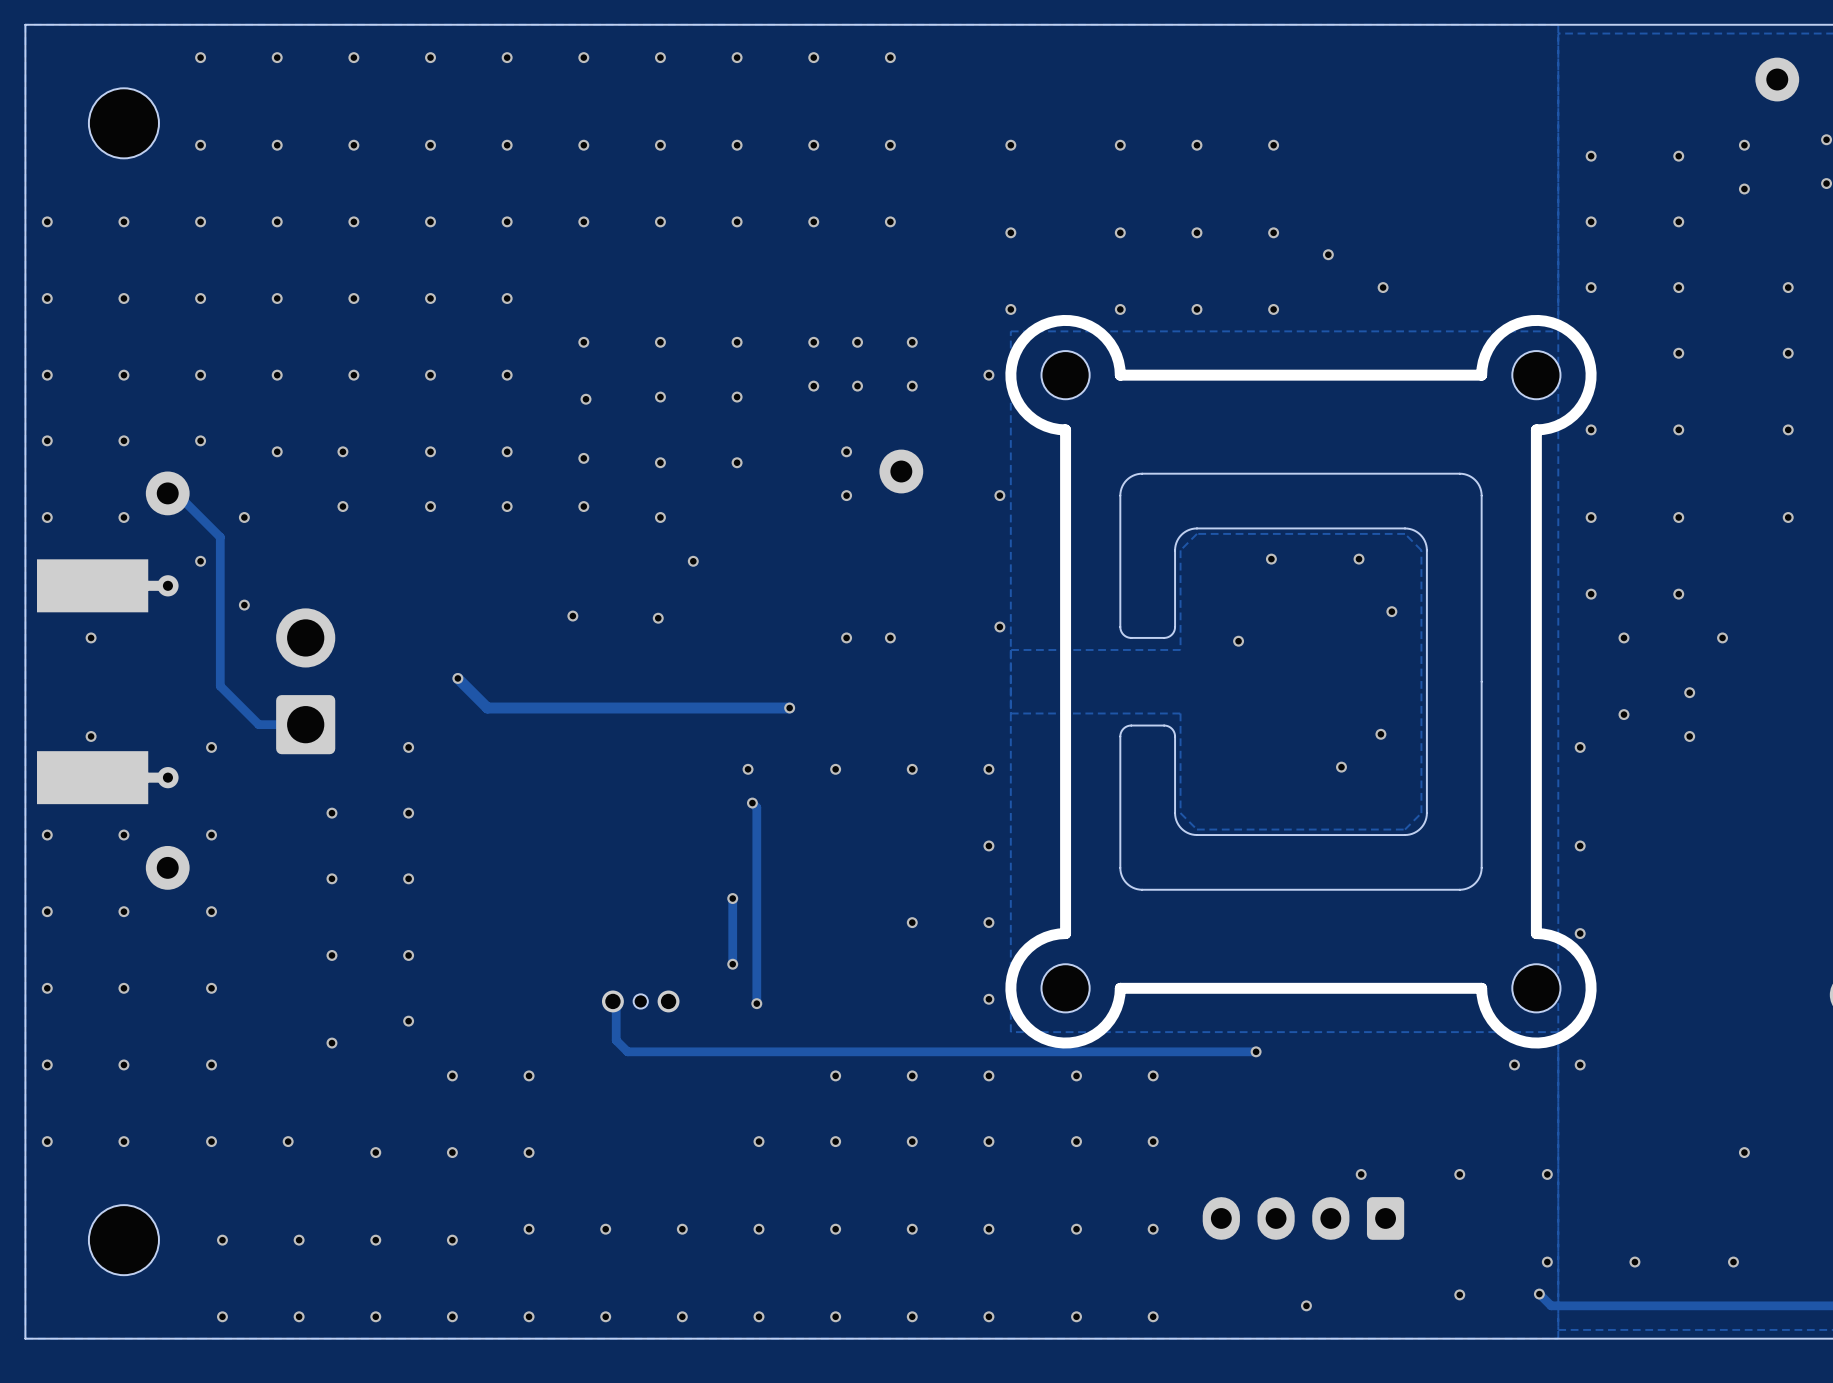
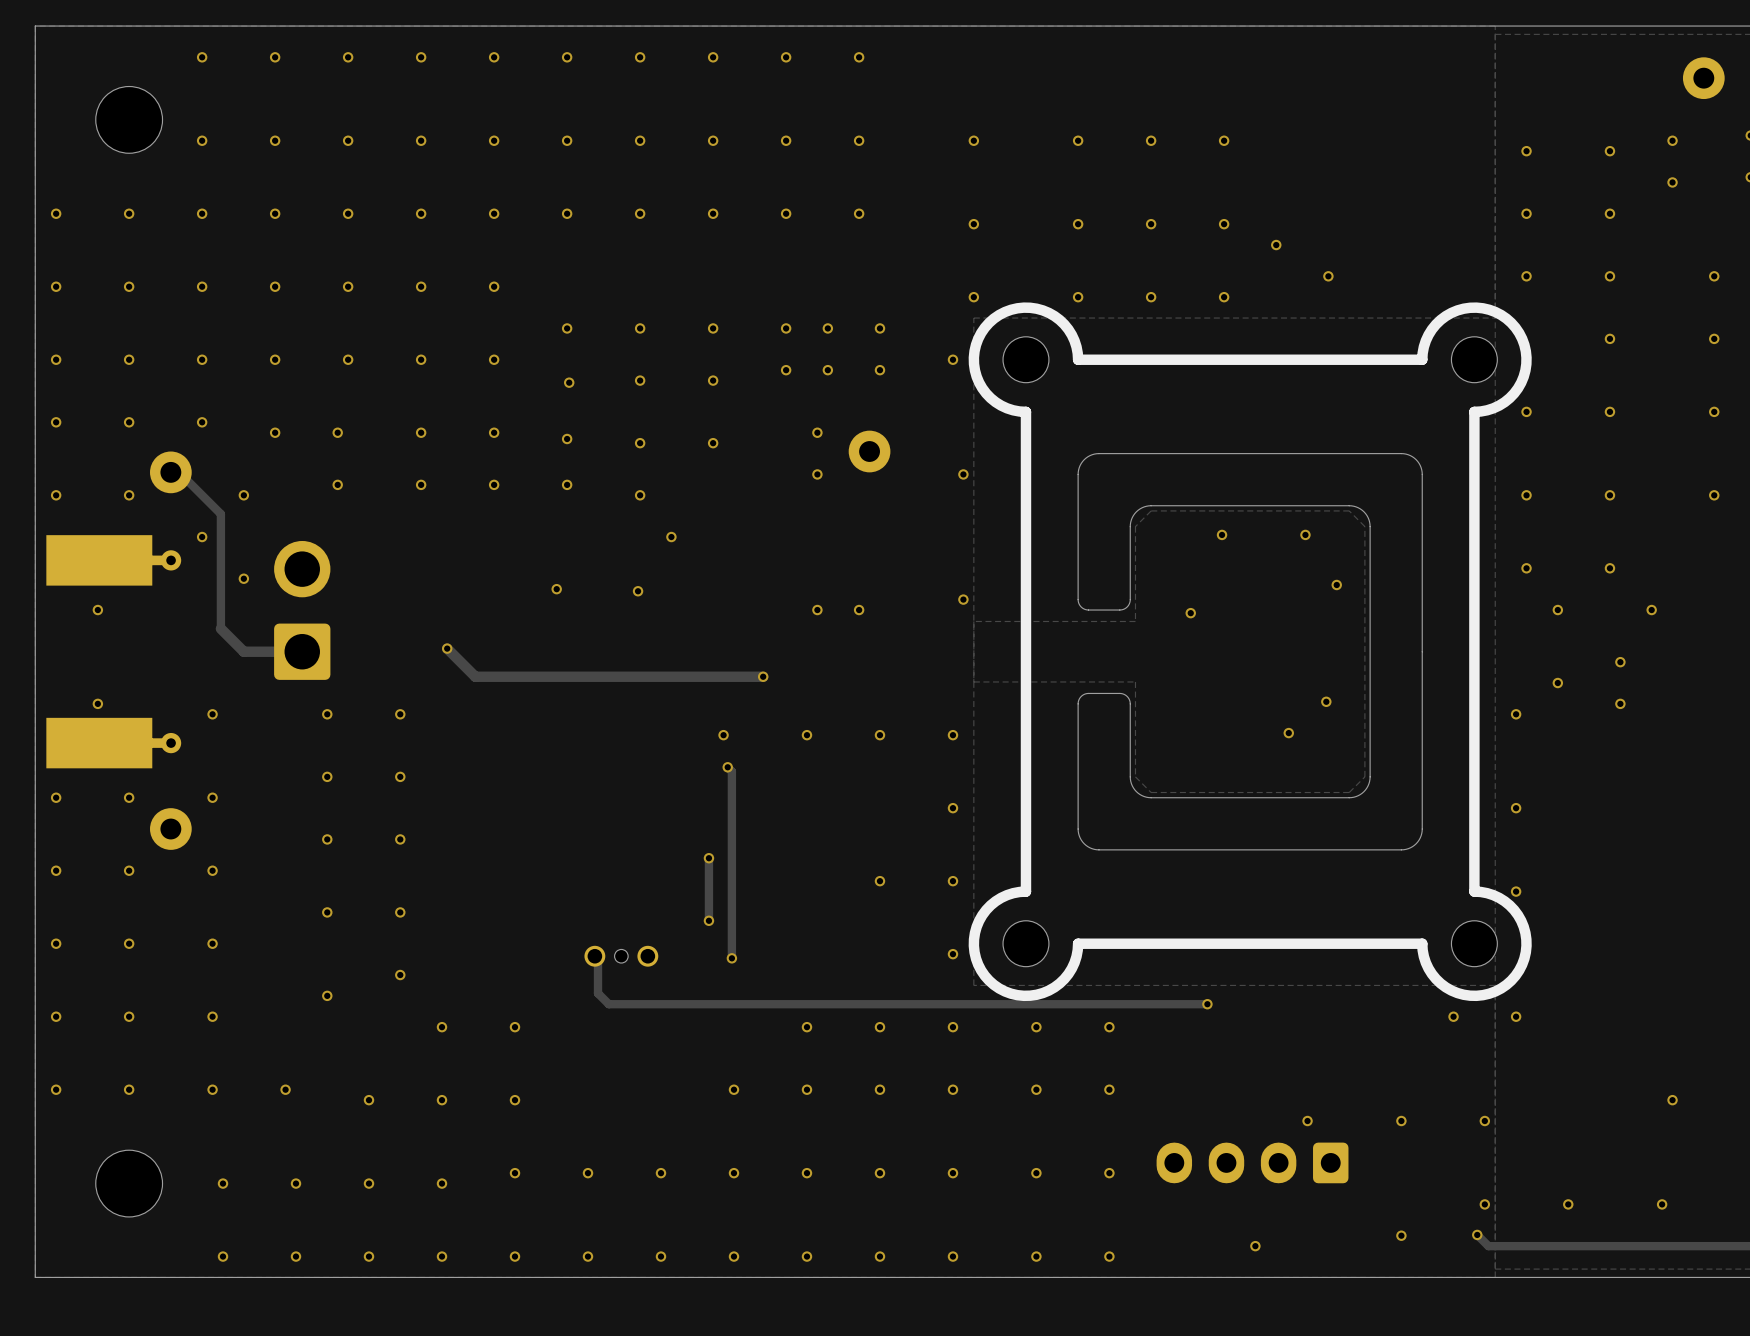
track: (220, 657) (220, 686) (258, 724) (305, 724) -> (220, 628) (243, 651) (302, 651)
part position: (305, 681) -> (302, 610)
via: none -> (327, 714)

